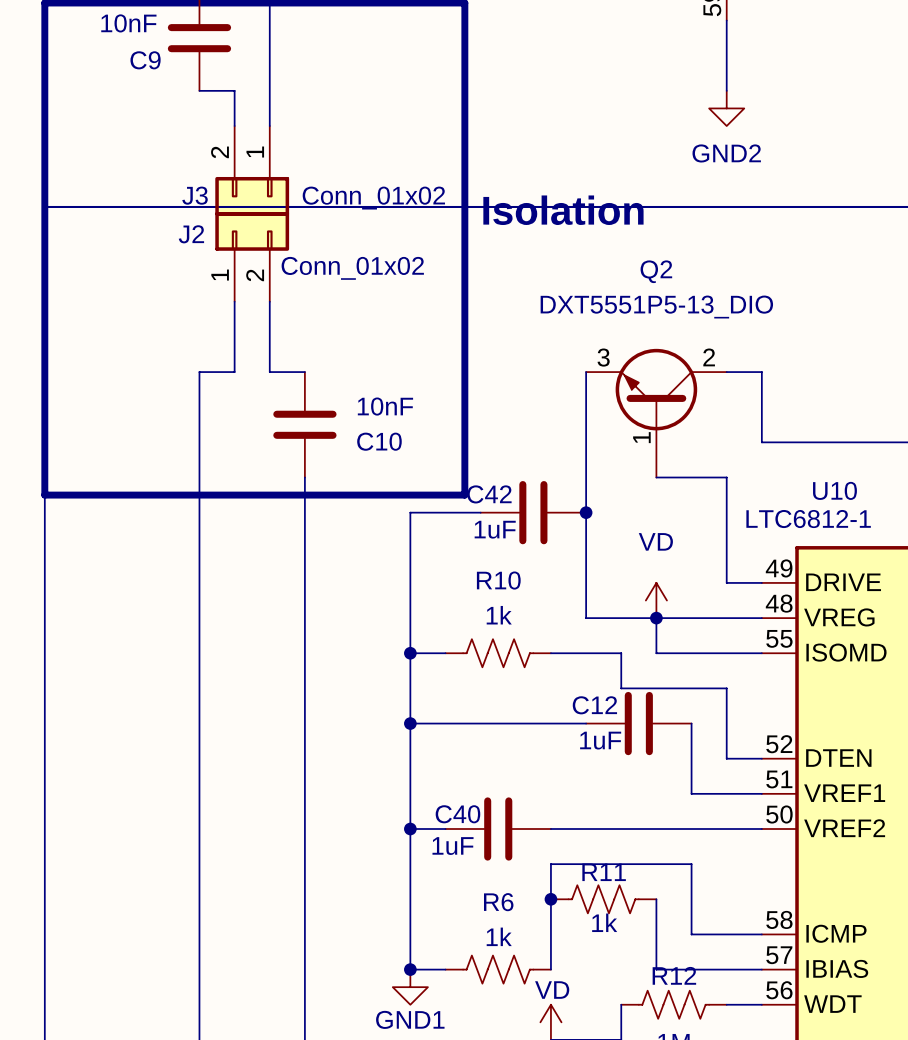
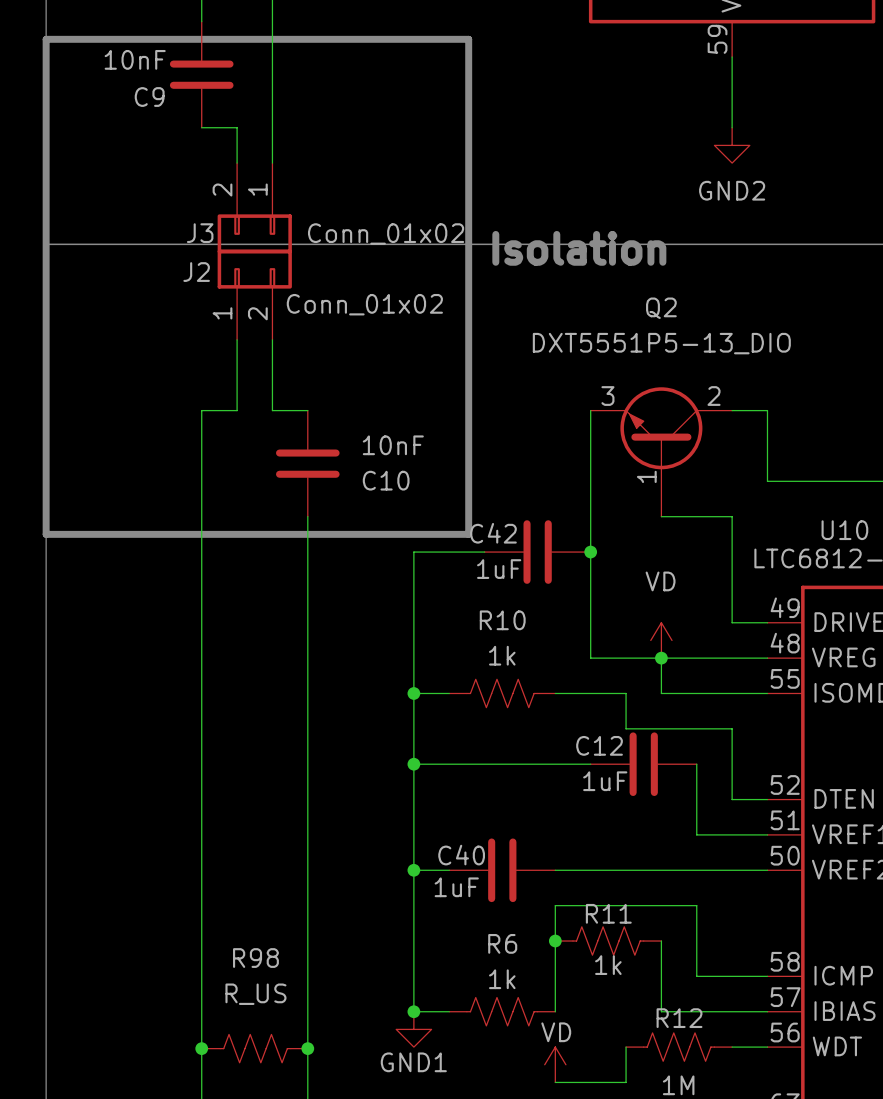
junction: none -> (201, 1048)
R98: none -> R_US (255, 1048)
junction: none -> (307, 1048)

